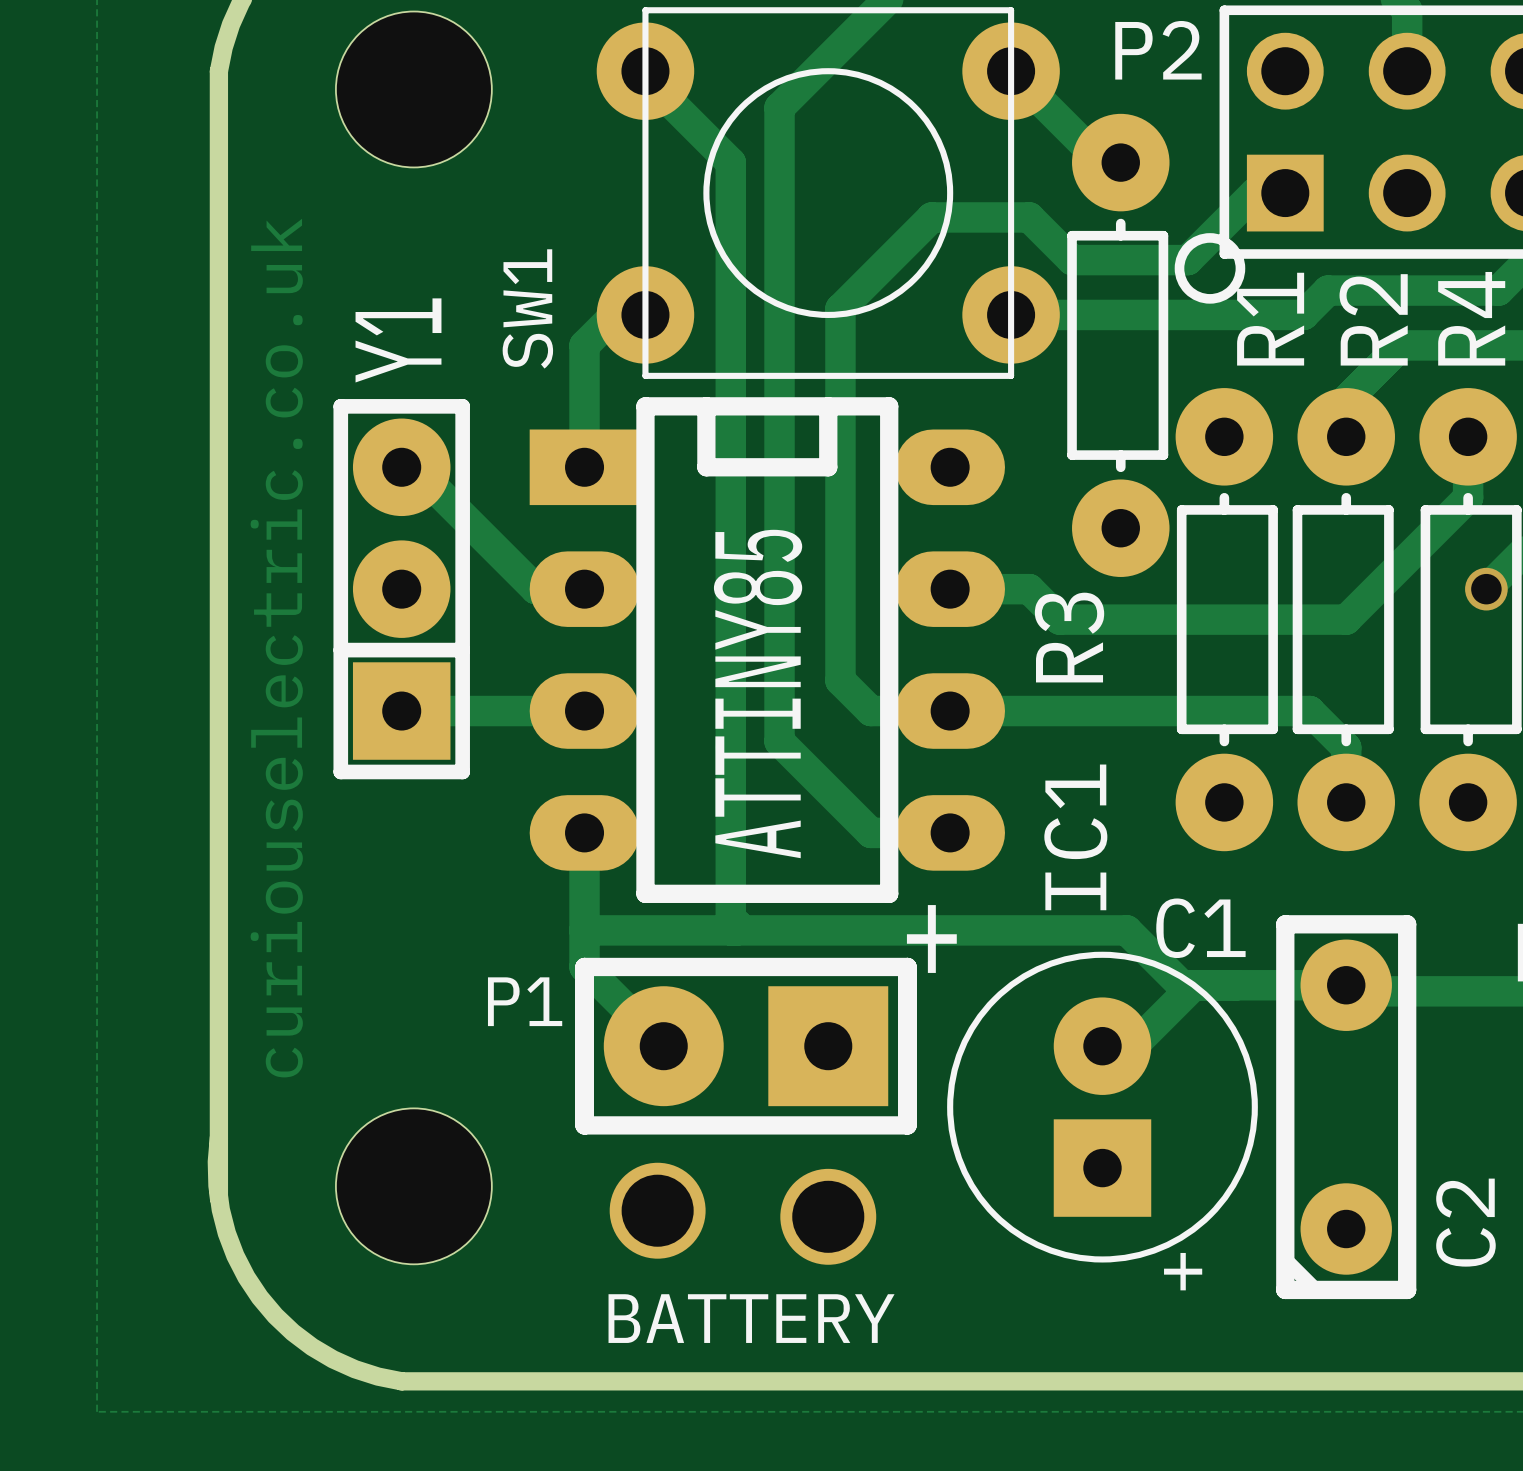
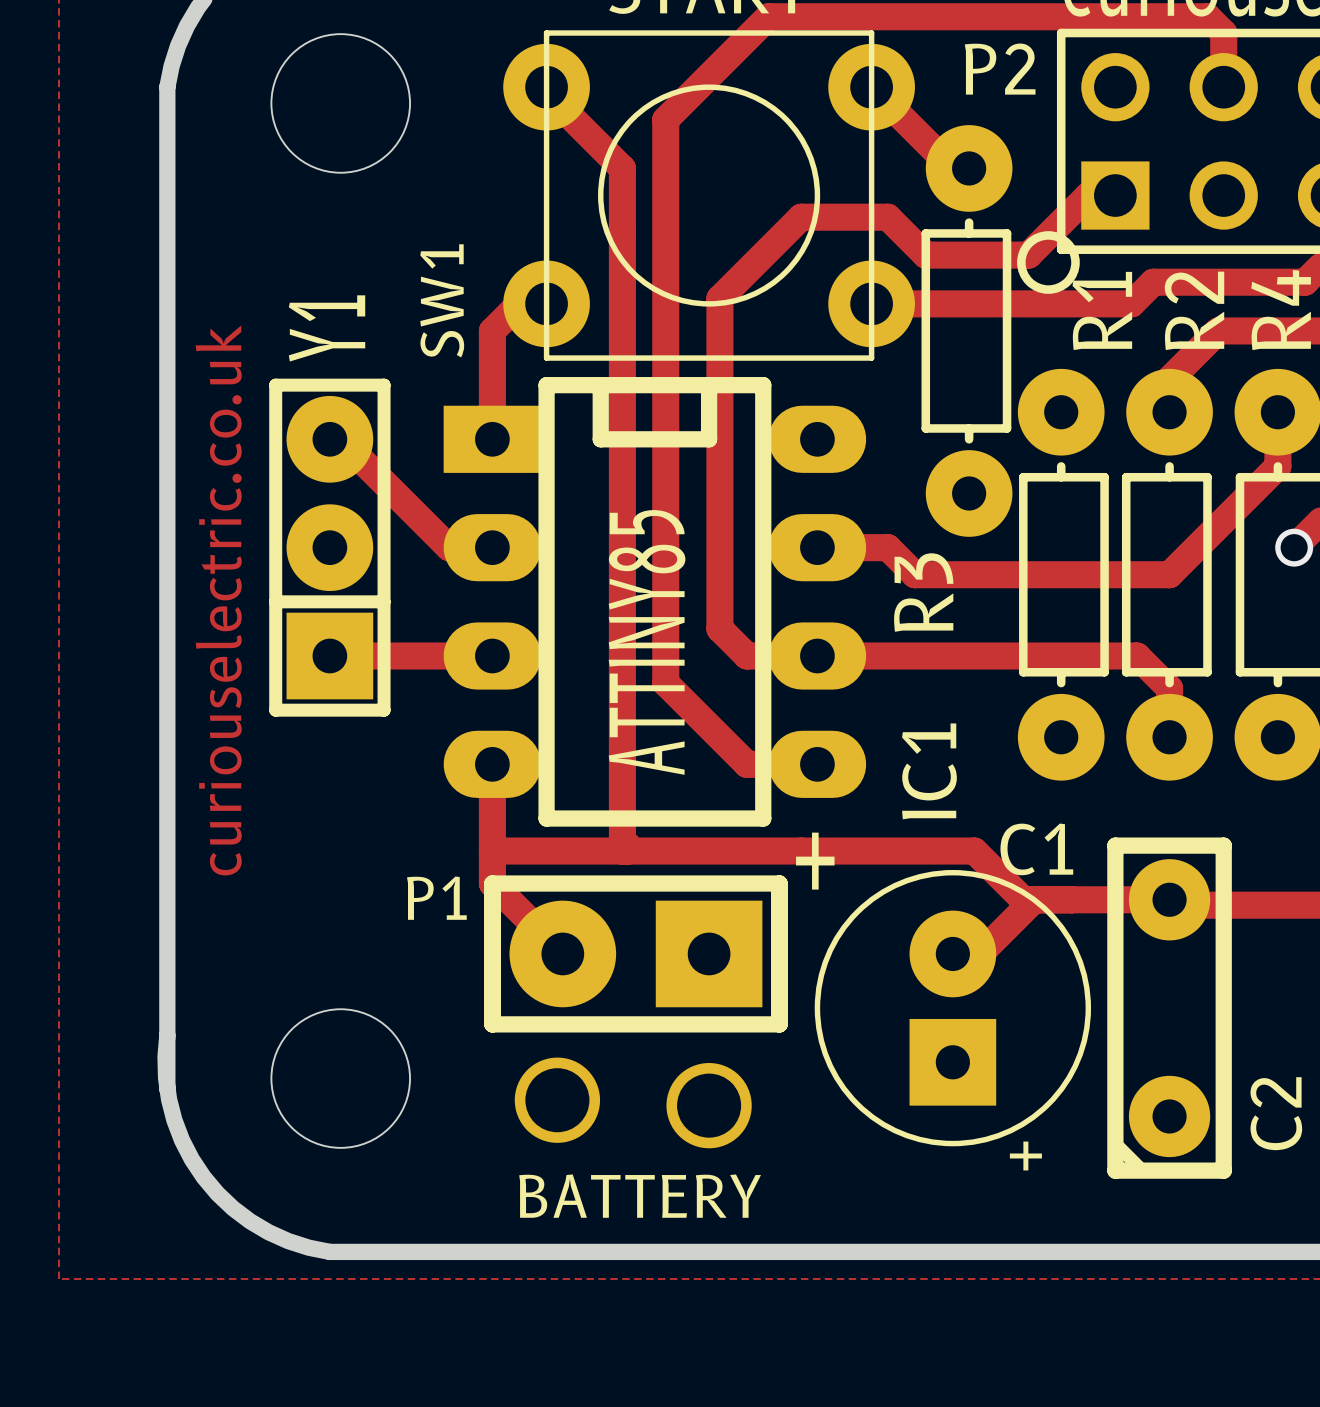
text position: + (931, 939) -> + (815, 861)
P1 name position: P1 (525, 1001) -> P1 (436, 898)

